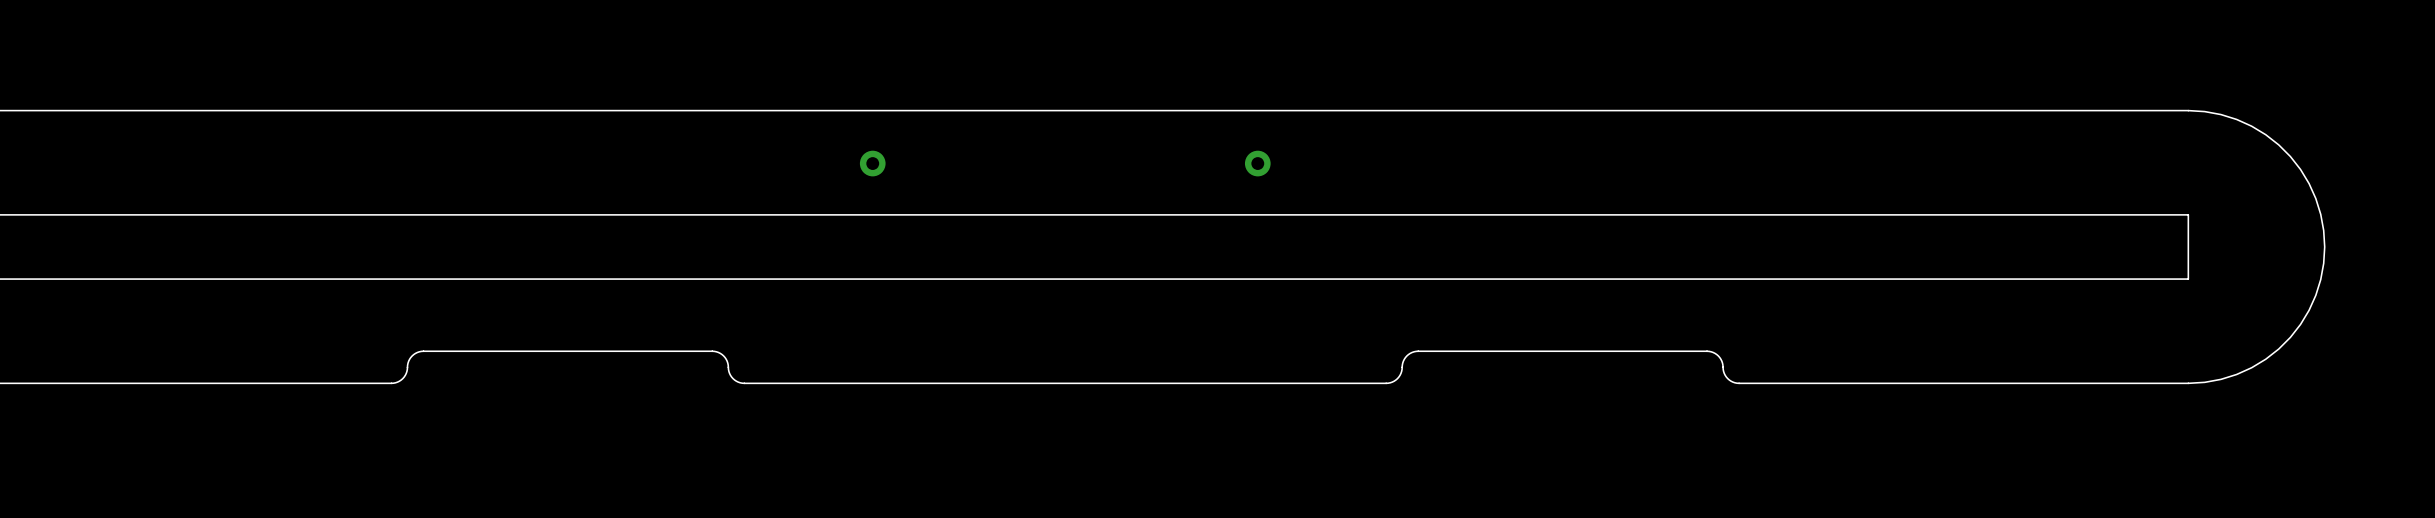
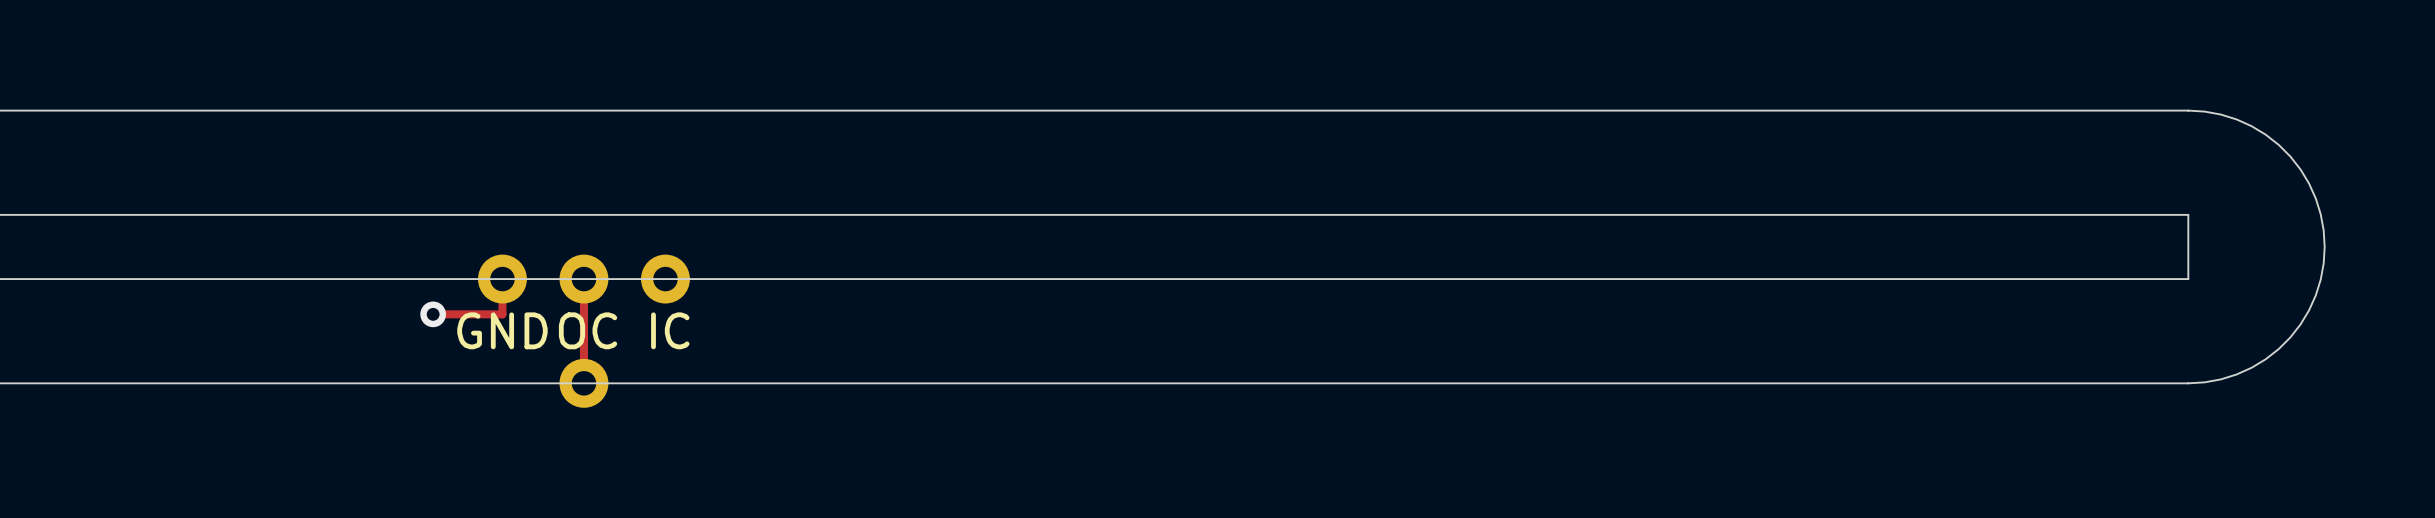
via: (872, 163) -> none
via: (1257, 163) -> none
part: none -> (583, 279)
track: none -> (502, 290) (502, 314) (433, 314)
track: none -> (583, 290) (583, 372)
via: none -> (433, 314)
board edge: (391, 383) (402, 378) (410, 357) (415, 353) (423, 351) (714, 351) (725, 357) (733, 378) (744, 383) -> (391, 383) (744, 383)
part: none -> (583, 383)
board edge: (1386, 383) (1397, 378) (1405, 357) (1410, 353) (1418, 351) (1709, 351) (1719, 357) (1727, 378) (1739, 383) -> (1386, 383) (1739, 383)

